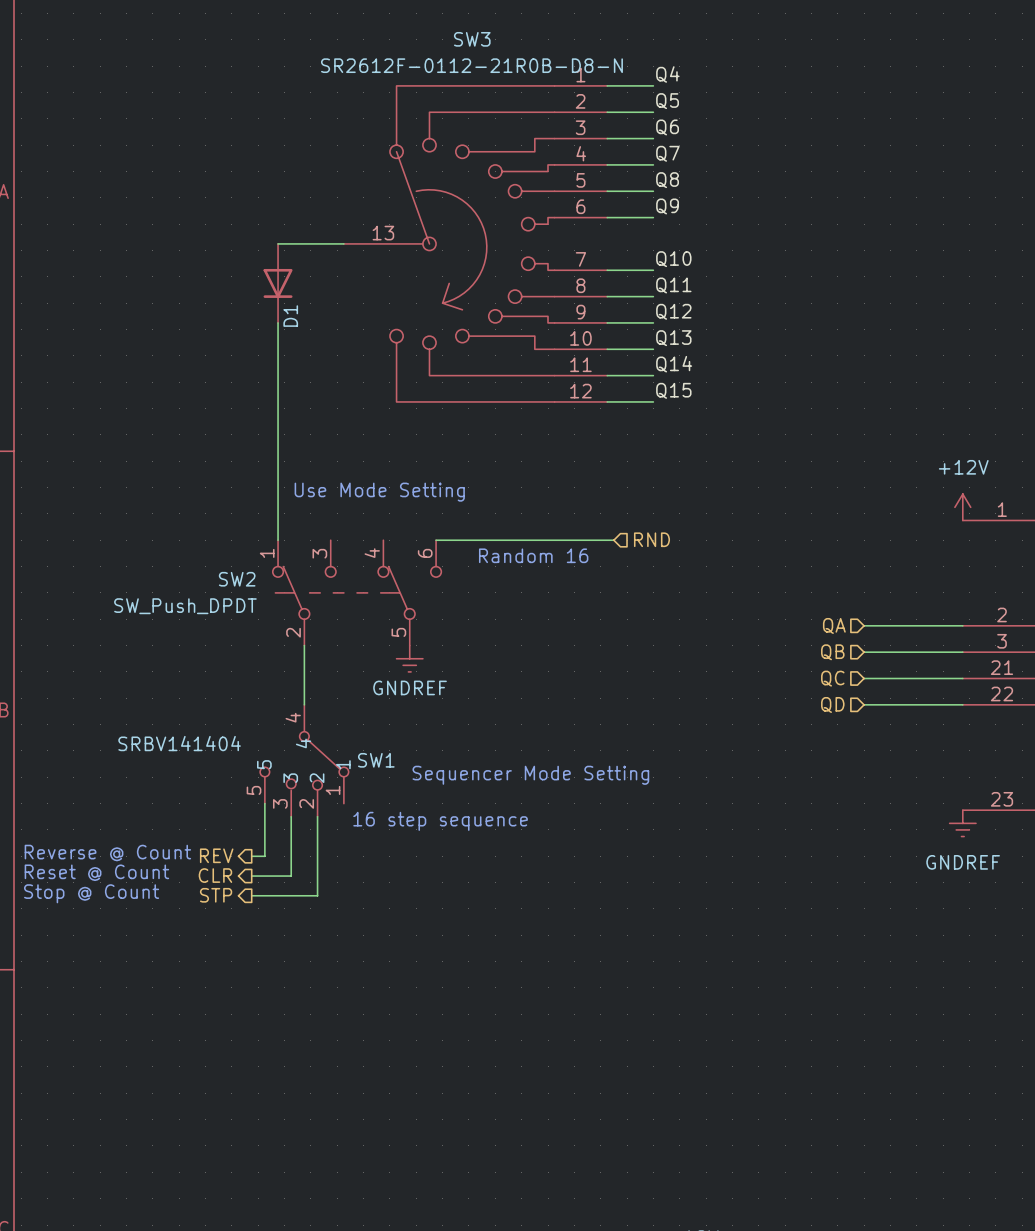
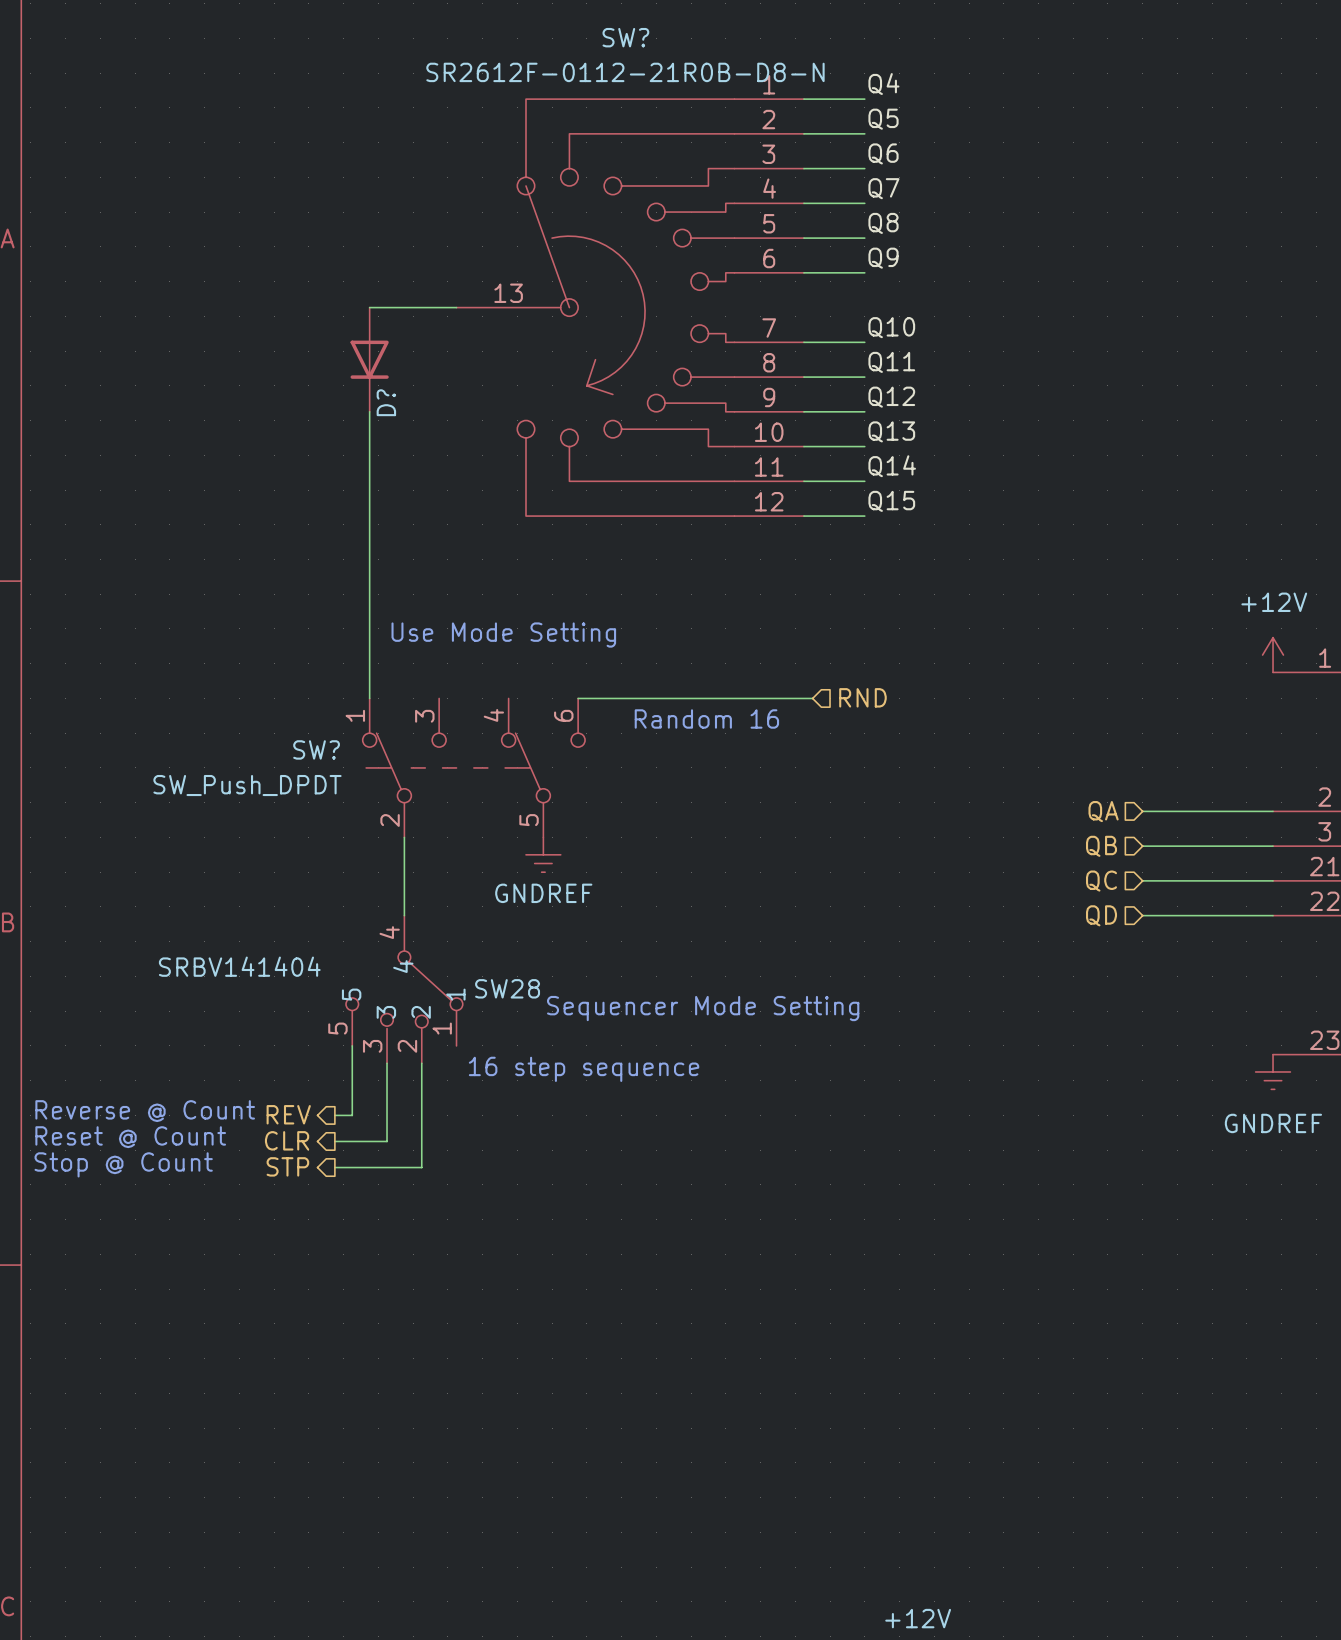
SW3 name: SW3 (472, 39) -> SW? (625, 37)
D1 name: D1 (290, 316) -> D? (386, 402)
SW2 name: SW2 (237, 579) -> SW? (316, 749)
SW1 name: SW1 (376, 760) -> SW28 (507, 988)

